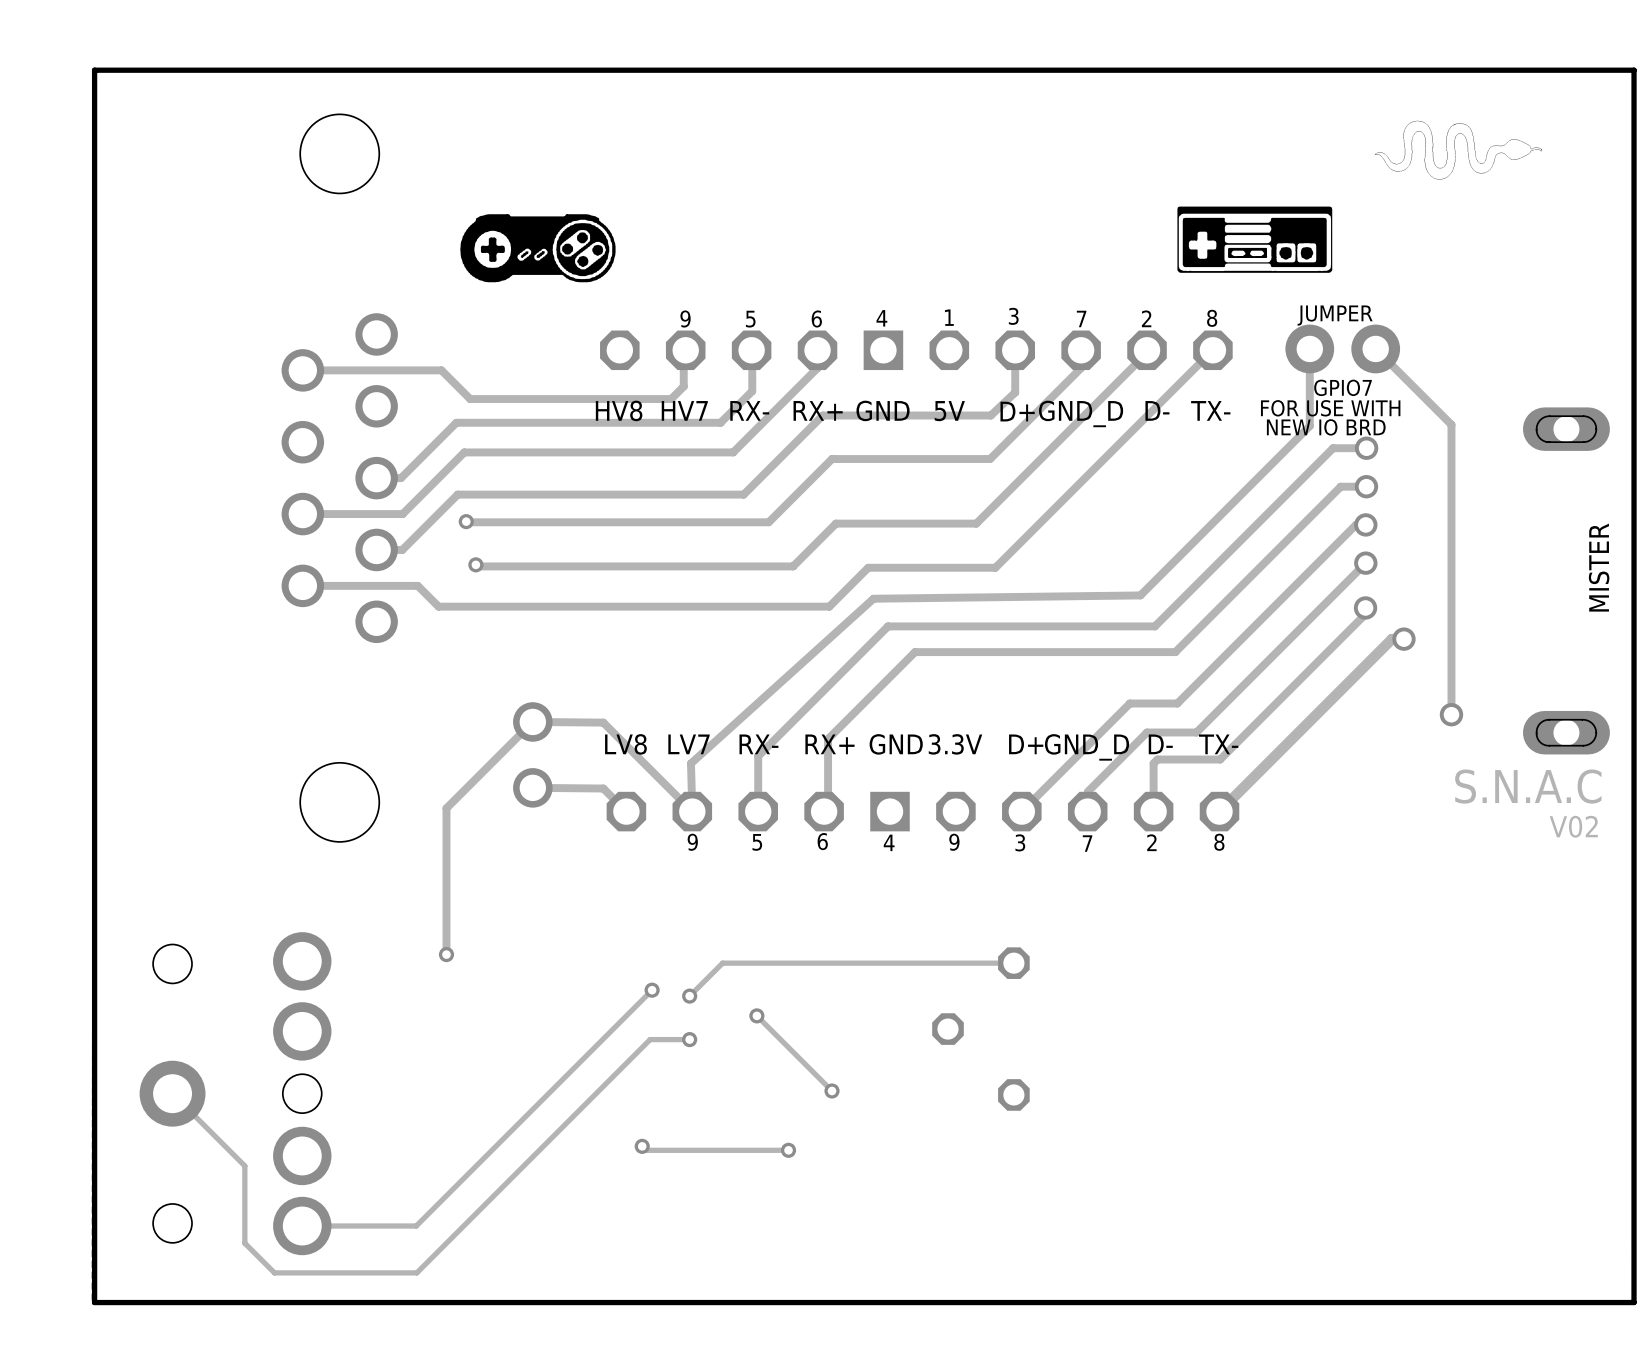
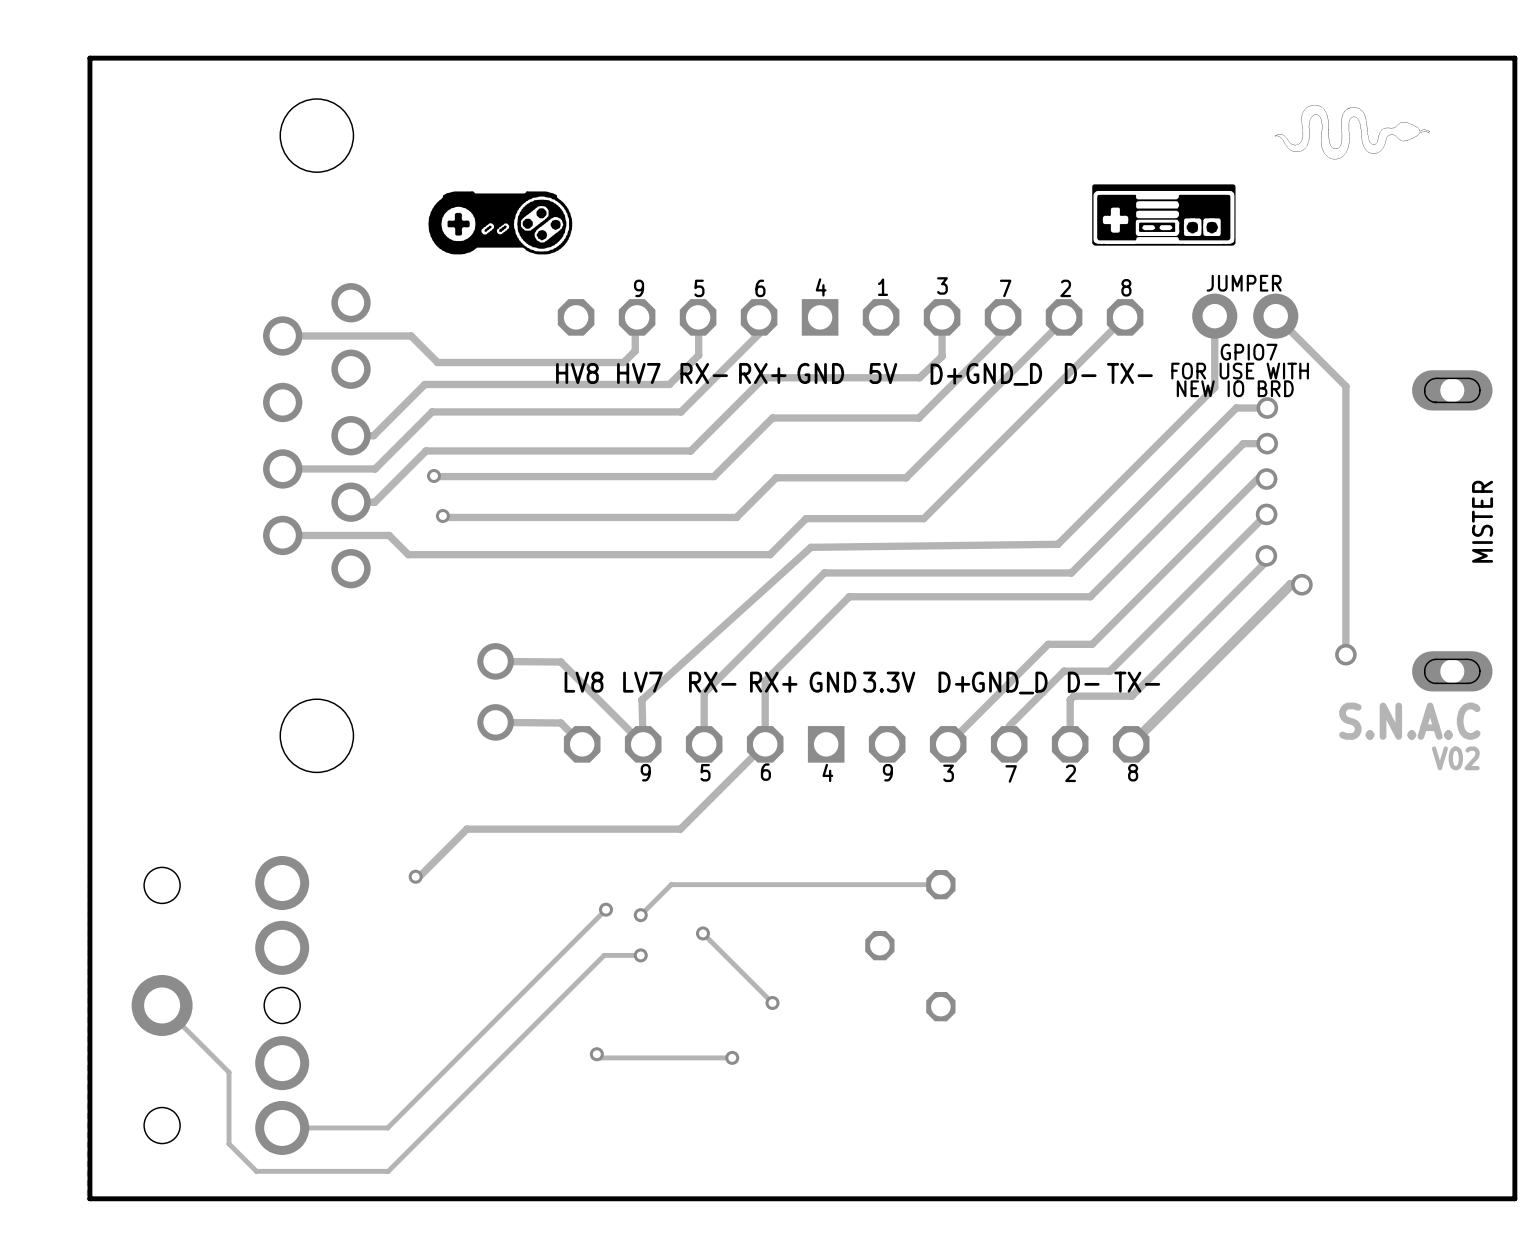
track: (532, 721) (446, 808) (446, 954) -> none
track: (828, 739) (828, 807) (824, 811) -> (768, 677) (765, 680) (765, 744) (680, 829) (466, 829) (417, 878)

